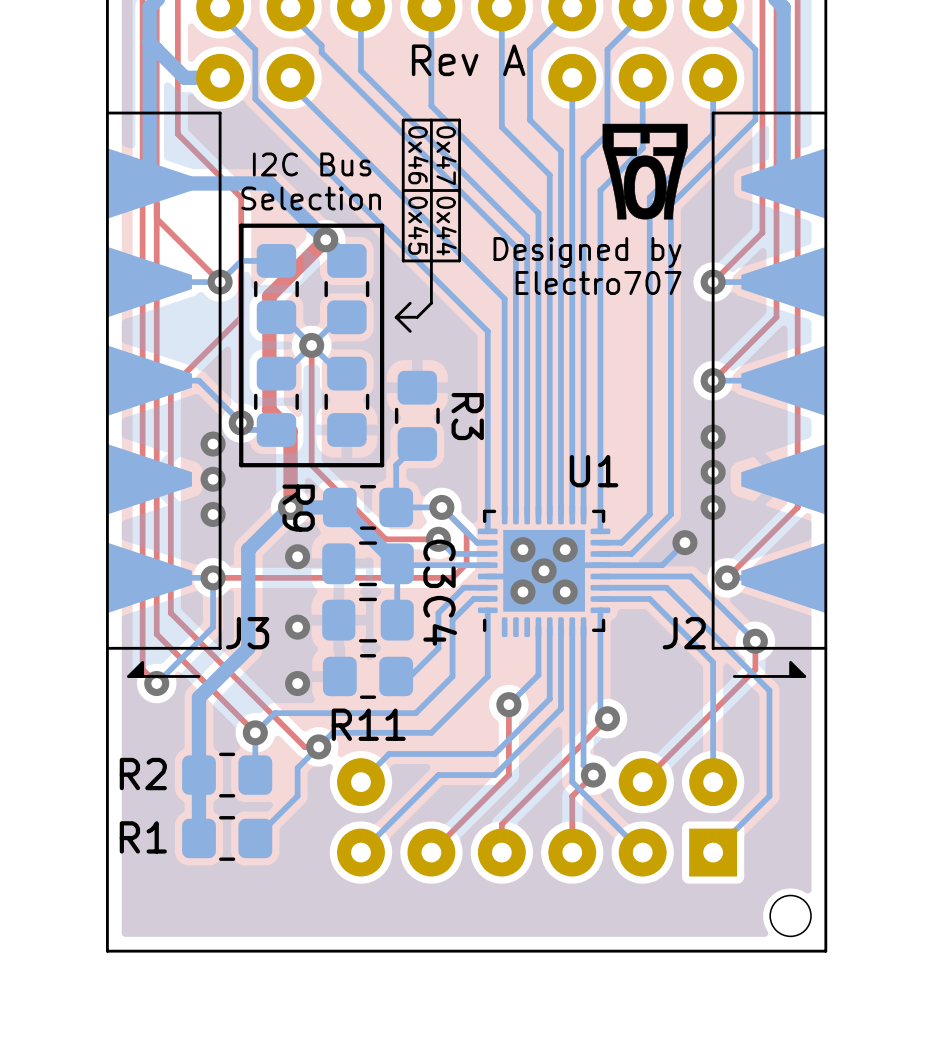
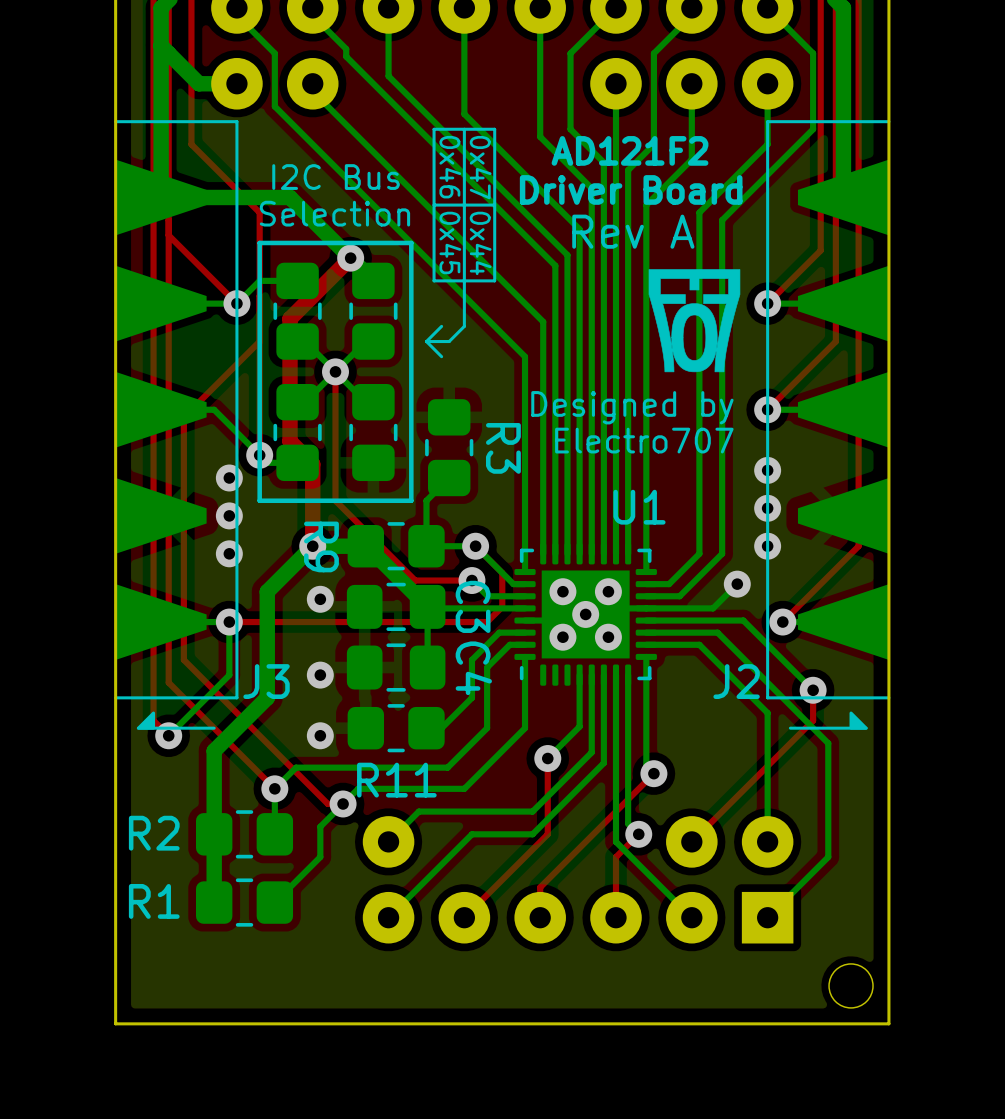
text position: Rev A (468, 60) -> Rev A (633, 231)
text: none -> AD121F2 (630, 150)
drawing position: (645, 171) -> (694, 320)
text: none -> Driver Board (631, 189)
drawing position: (645, 187) -> (694, 337)
text position: Designed by (587, 252) -> Designed by (632, 407)
text position: Electro707 (598, 283) -> Electro707 (644, 440)

